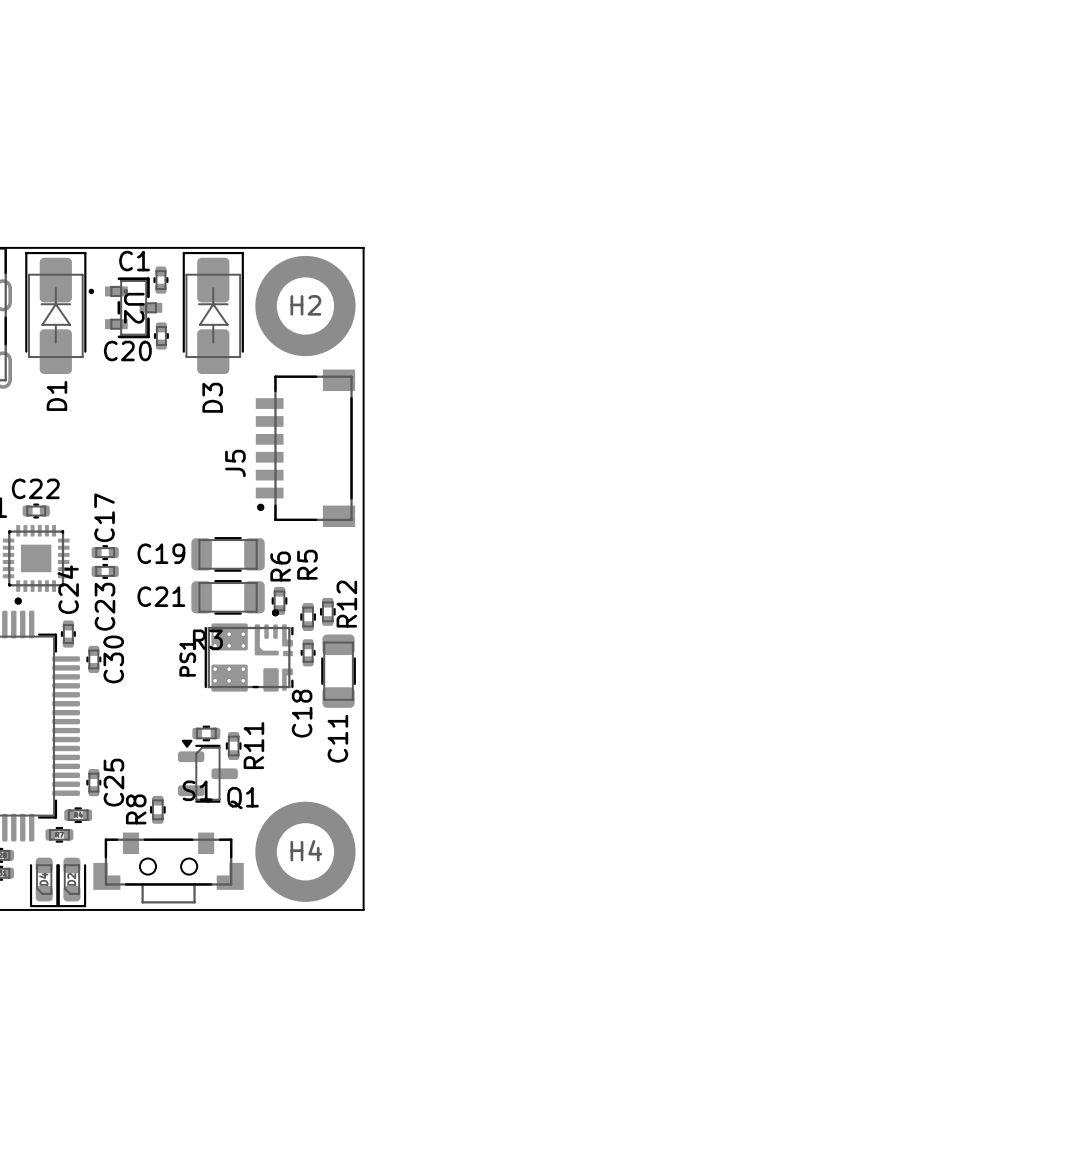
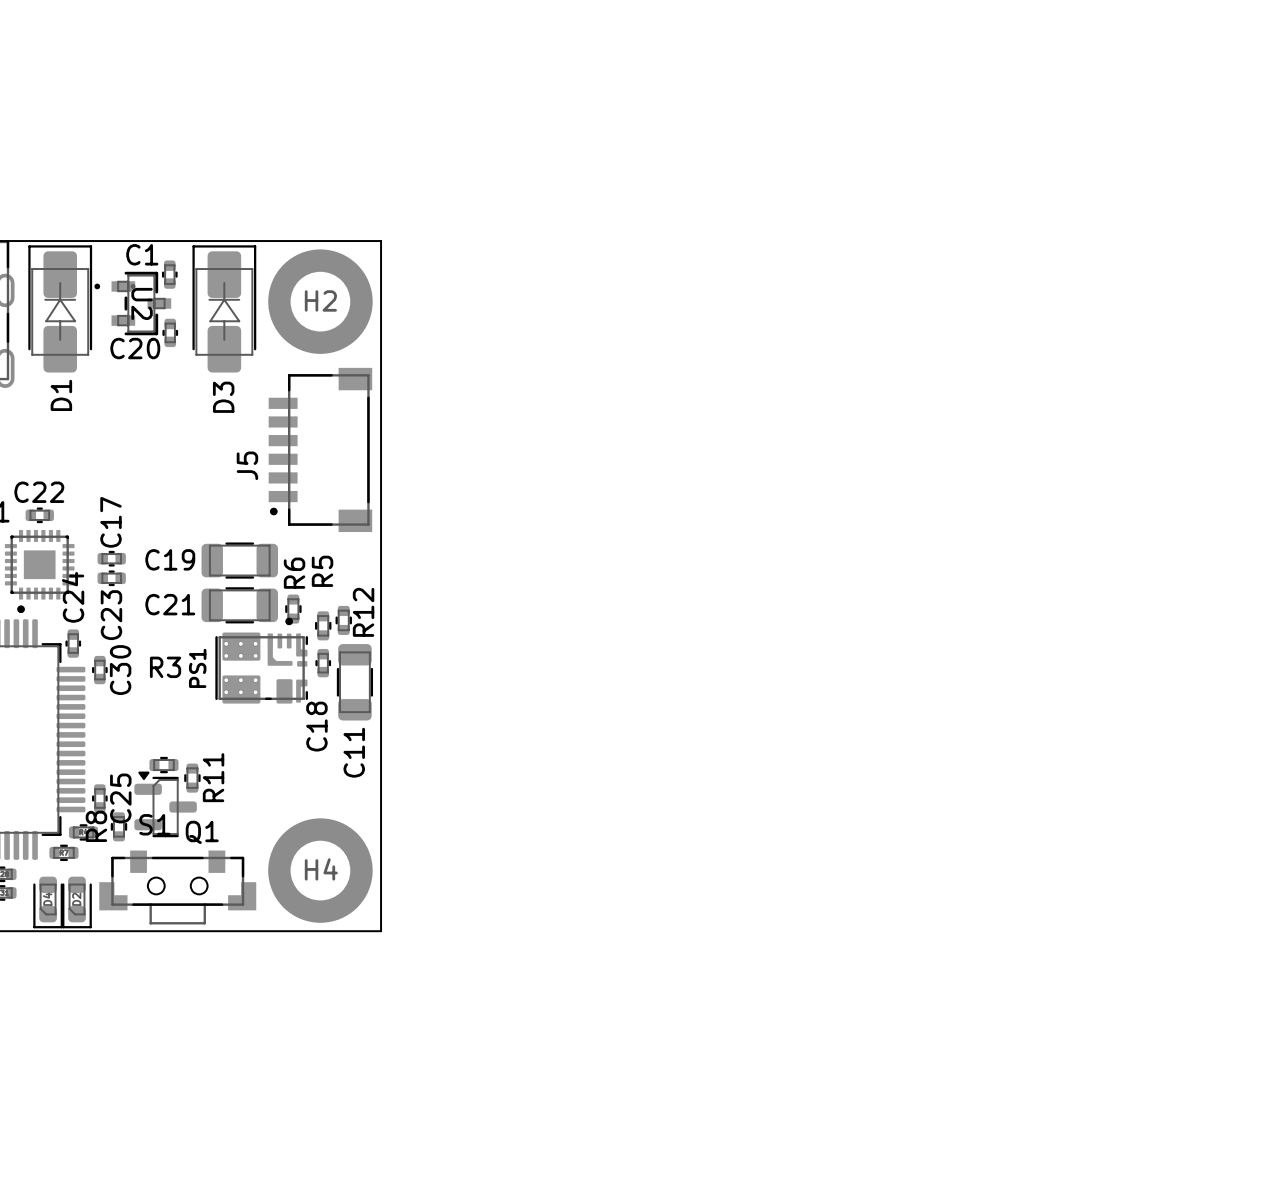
R3 position: (206, 733) -> (163, 765)
R11 position: (233, 746) -> (192, 778)
Q1 position: (207, 771) -> (165, 804)
S1 name position: S1 (197, 790) -> S1 (154, 824)
R8 position: (157, 809) -> (118, 826)

